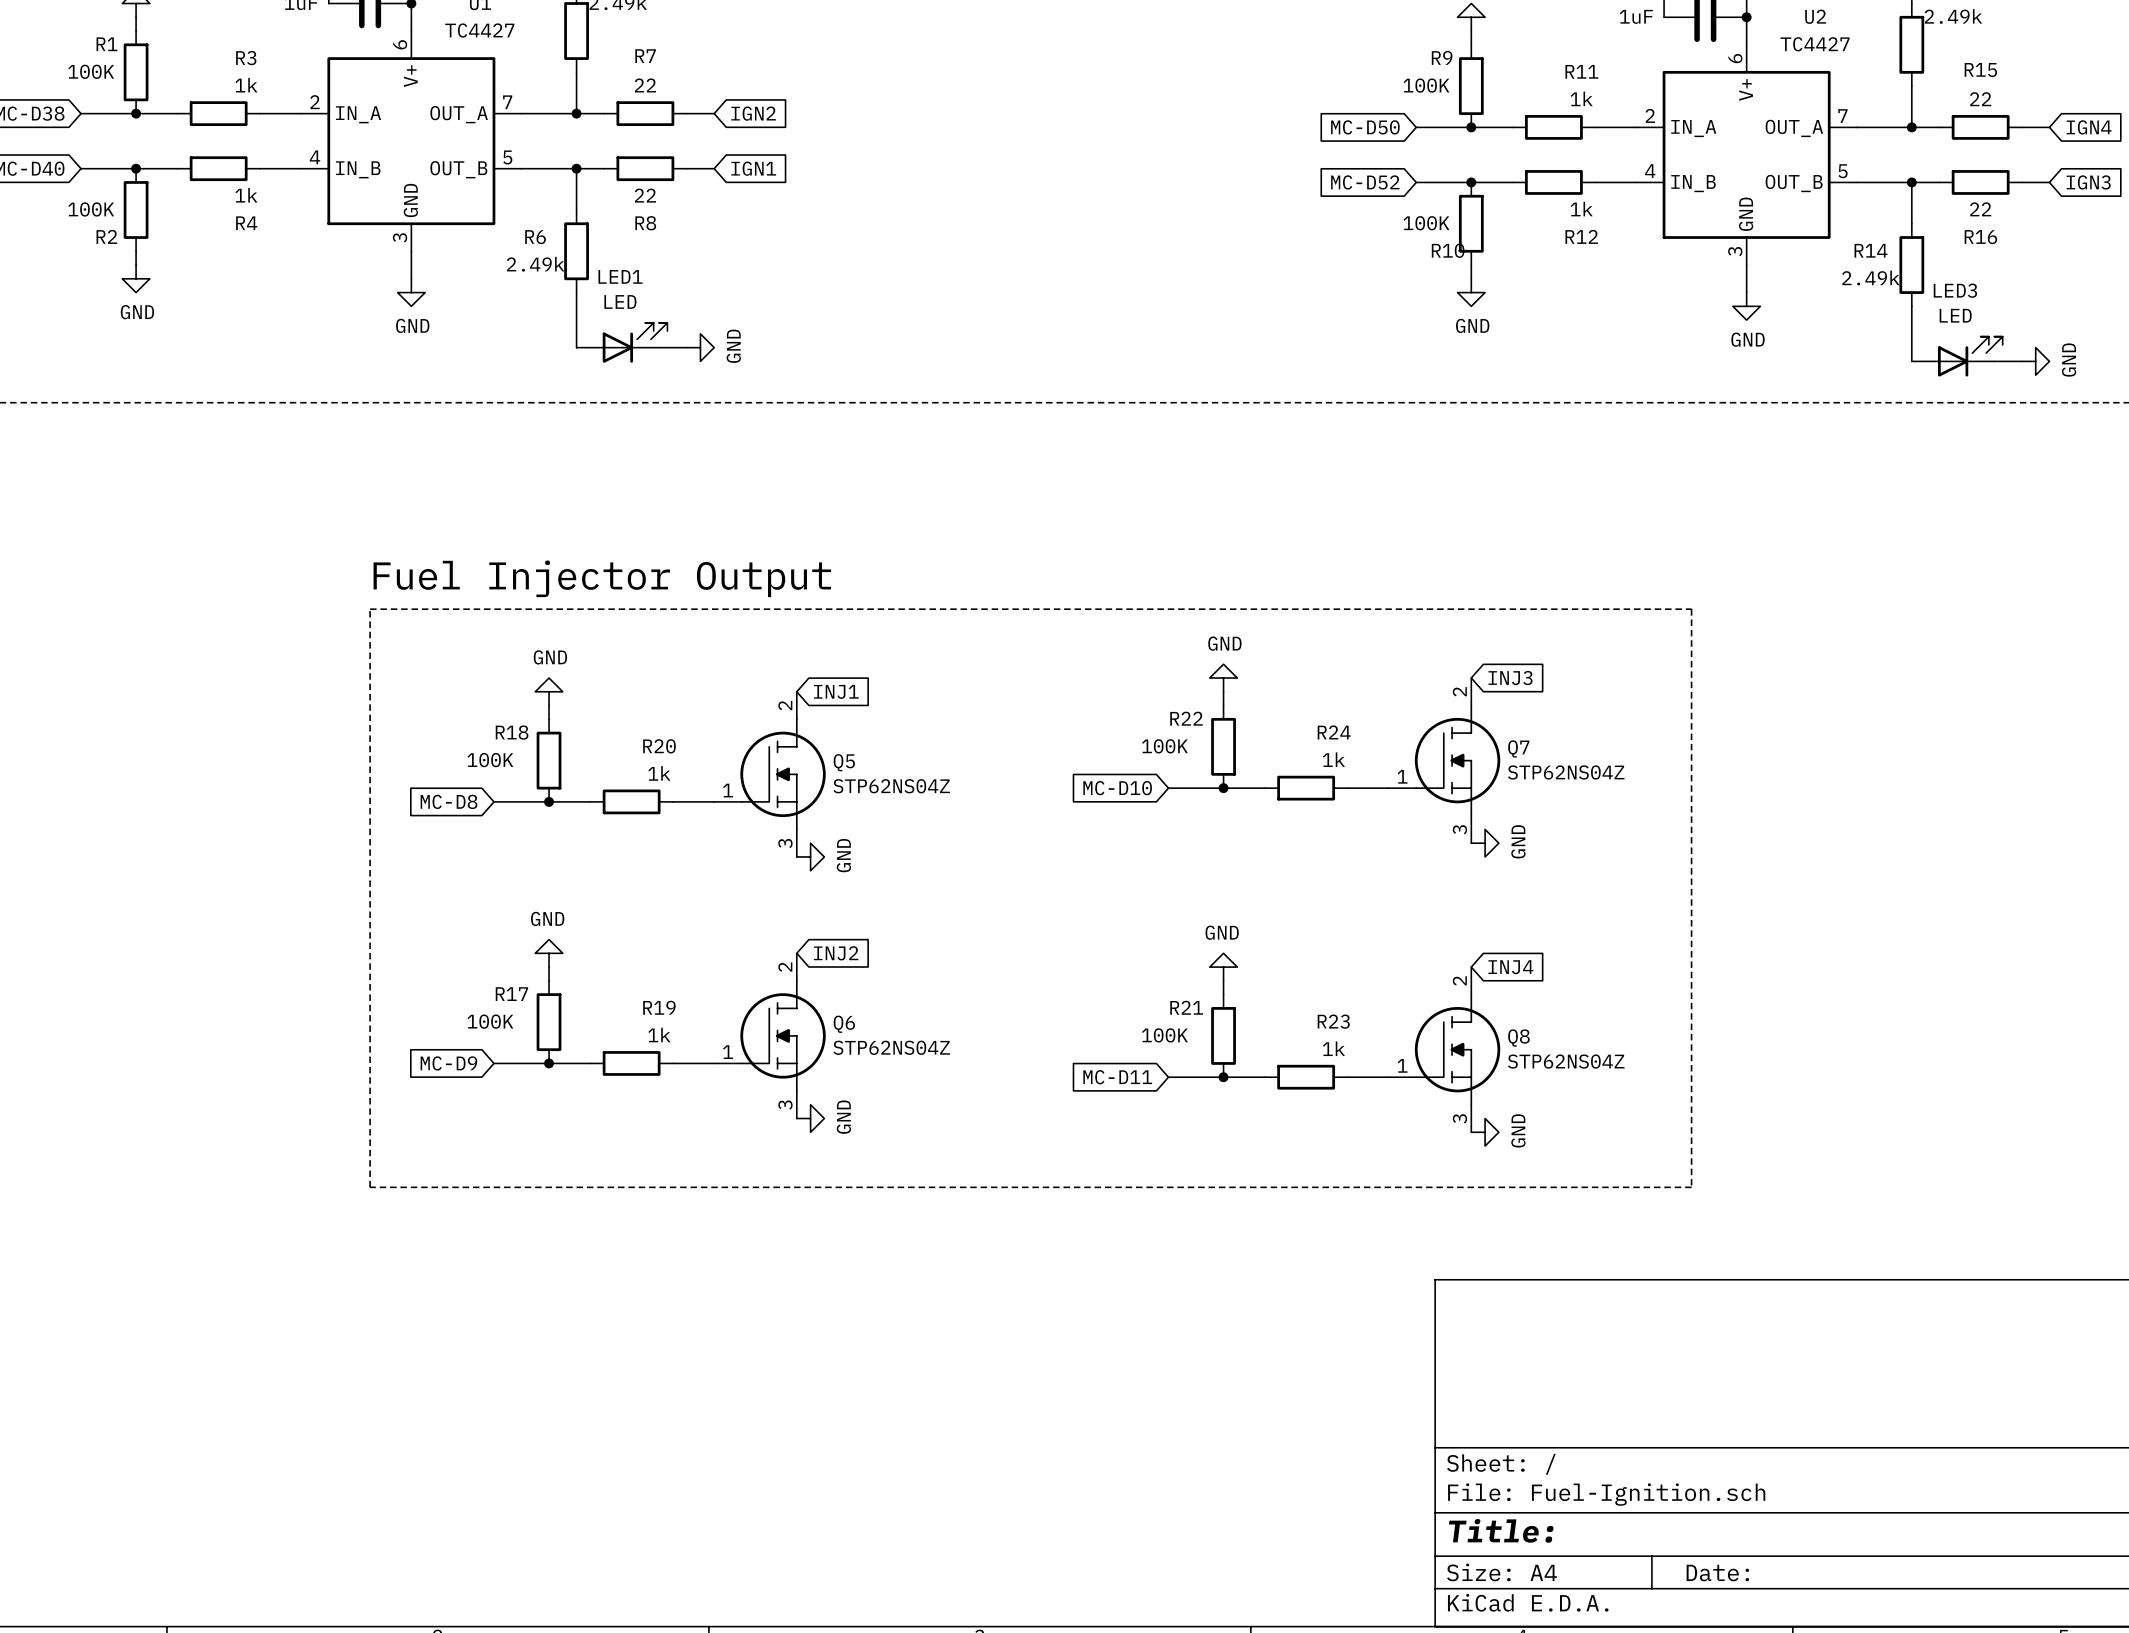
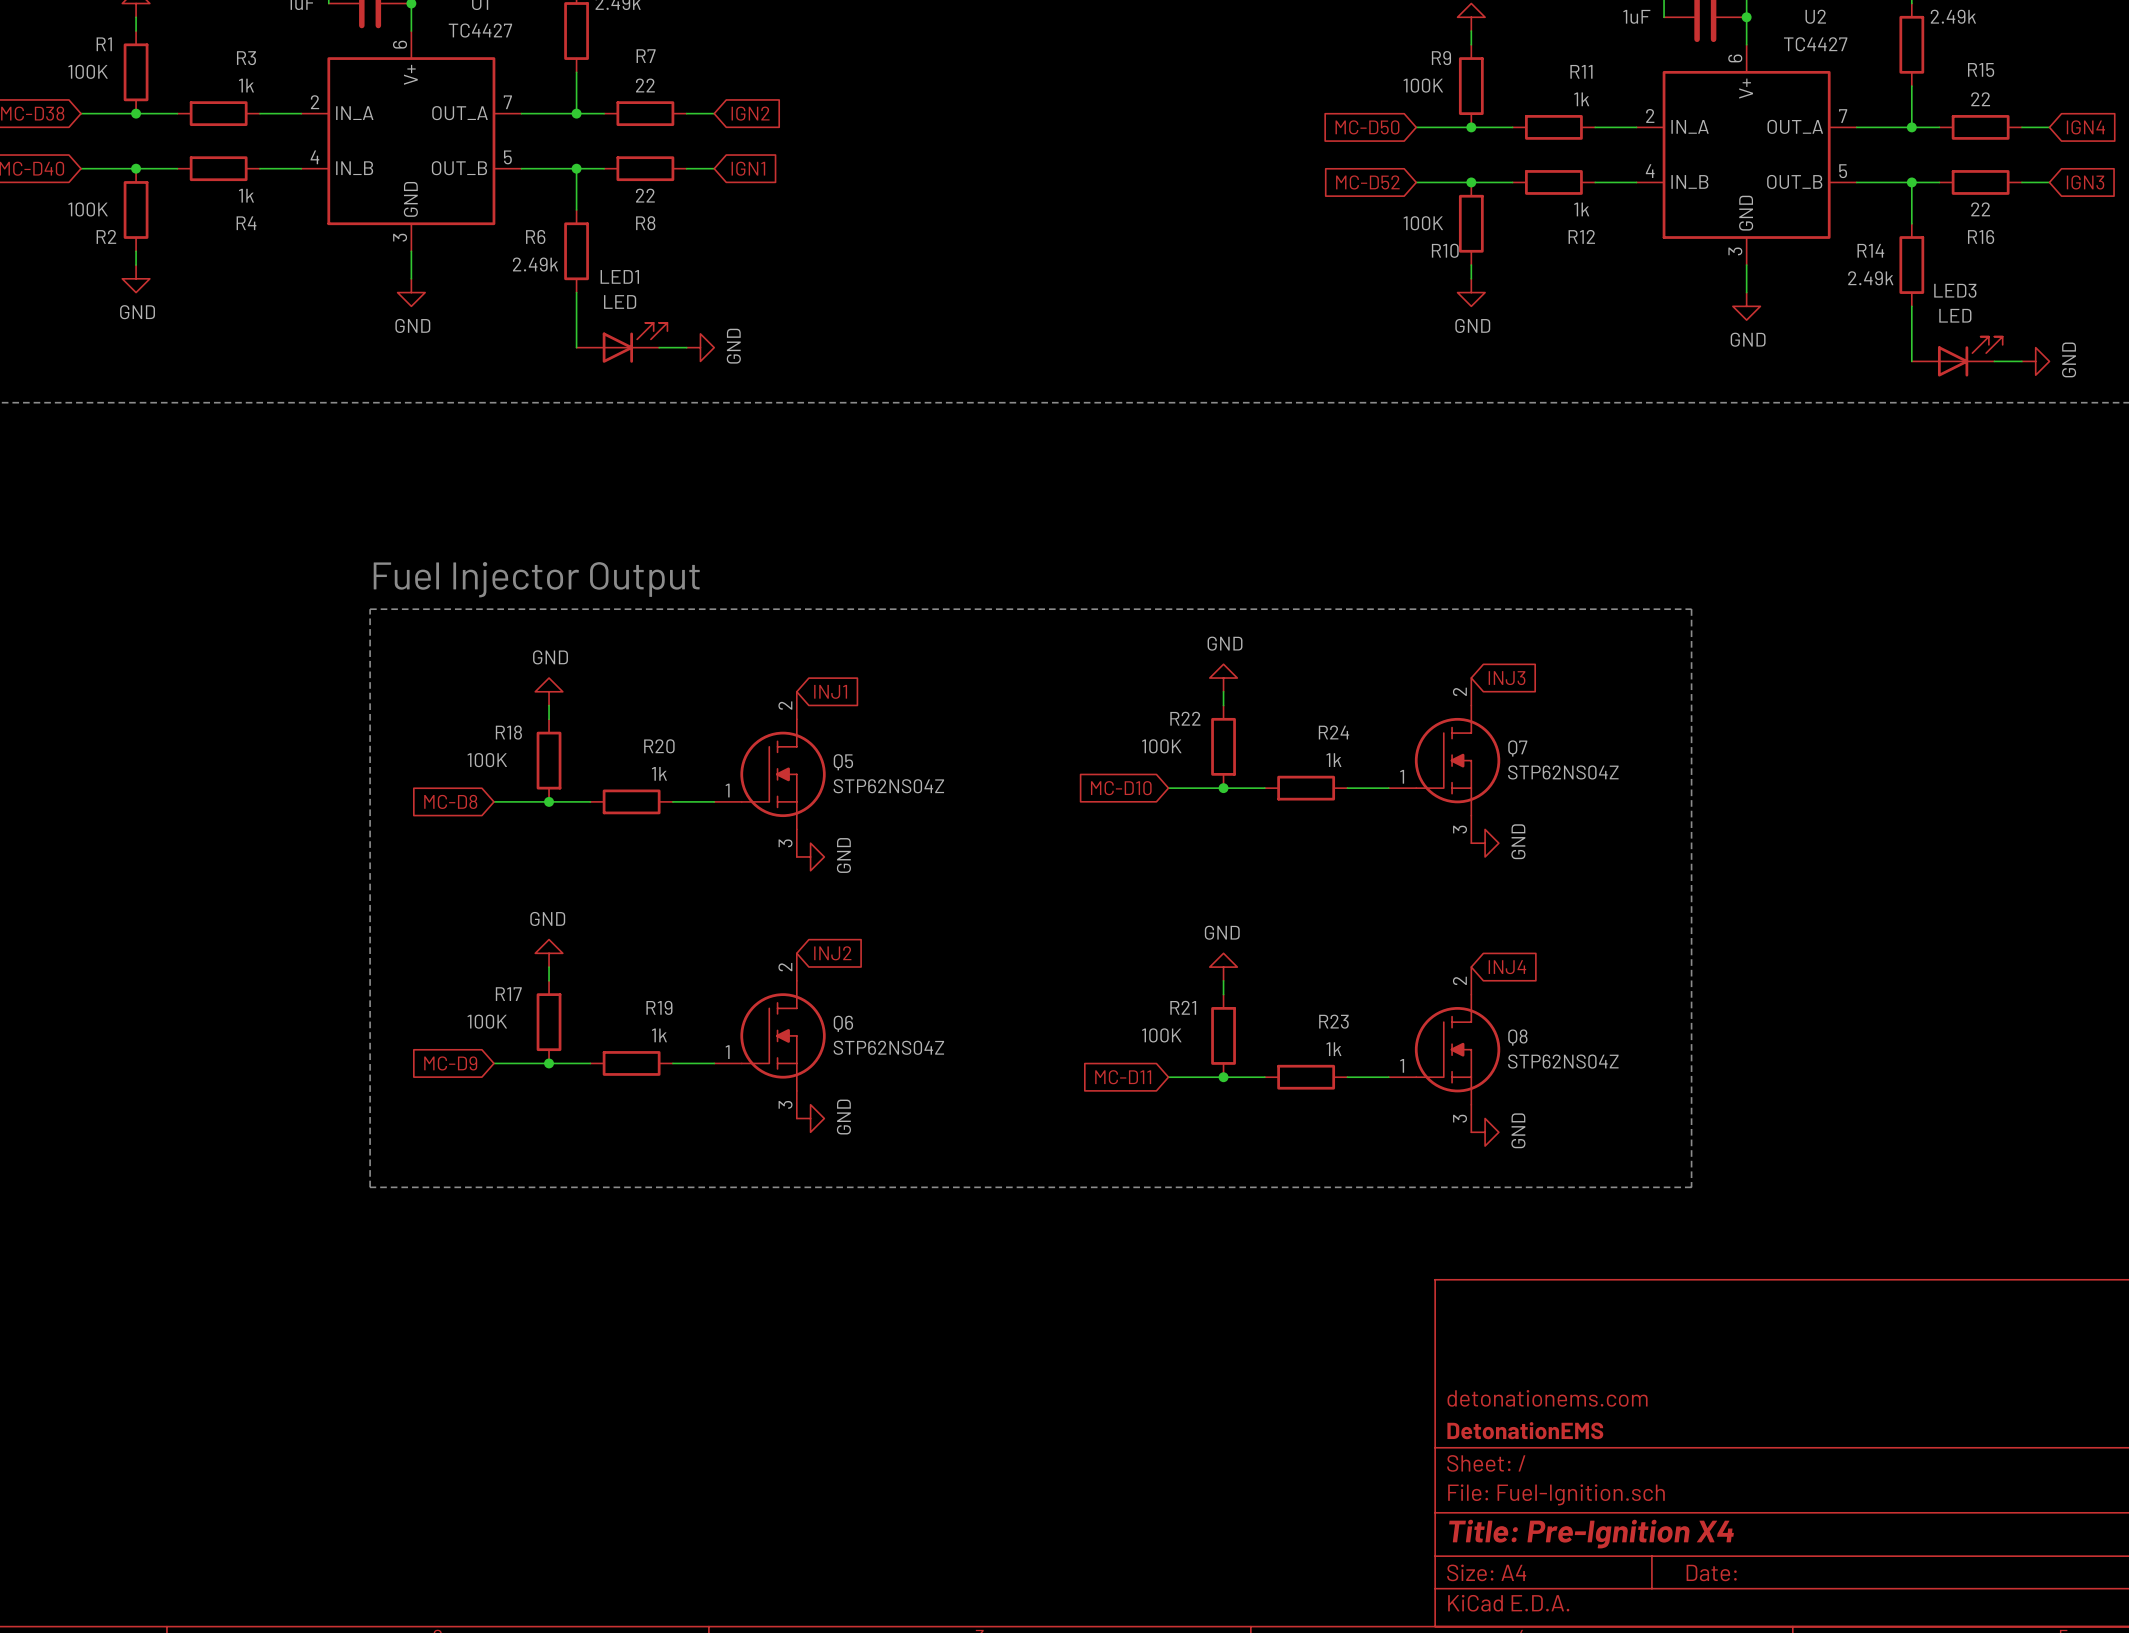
title block: none -> detonationems.com (1547, 1398)
title block: none -> DetonationEMS (1525, 1430)
title block: Title: (1501, 1530) -> Title: Pre-Ignition X4 (1591, 1534)

